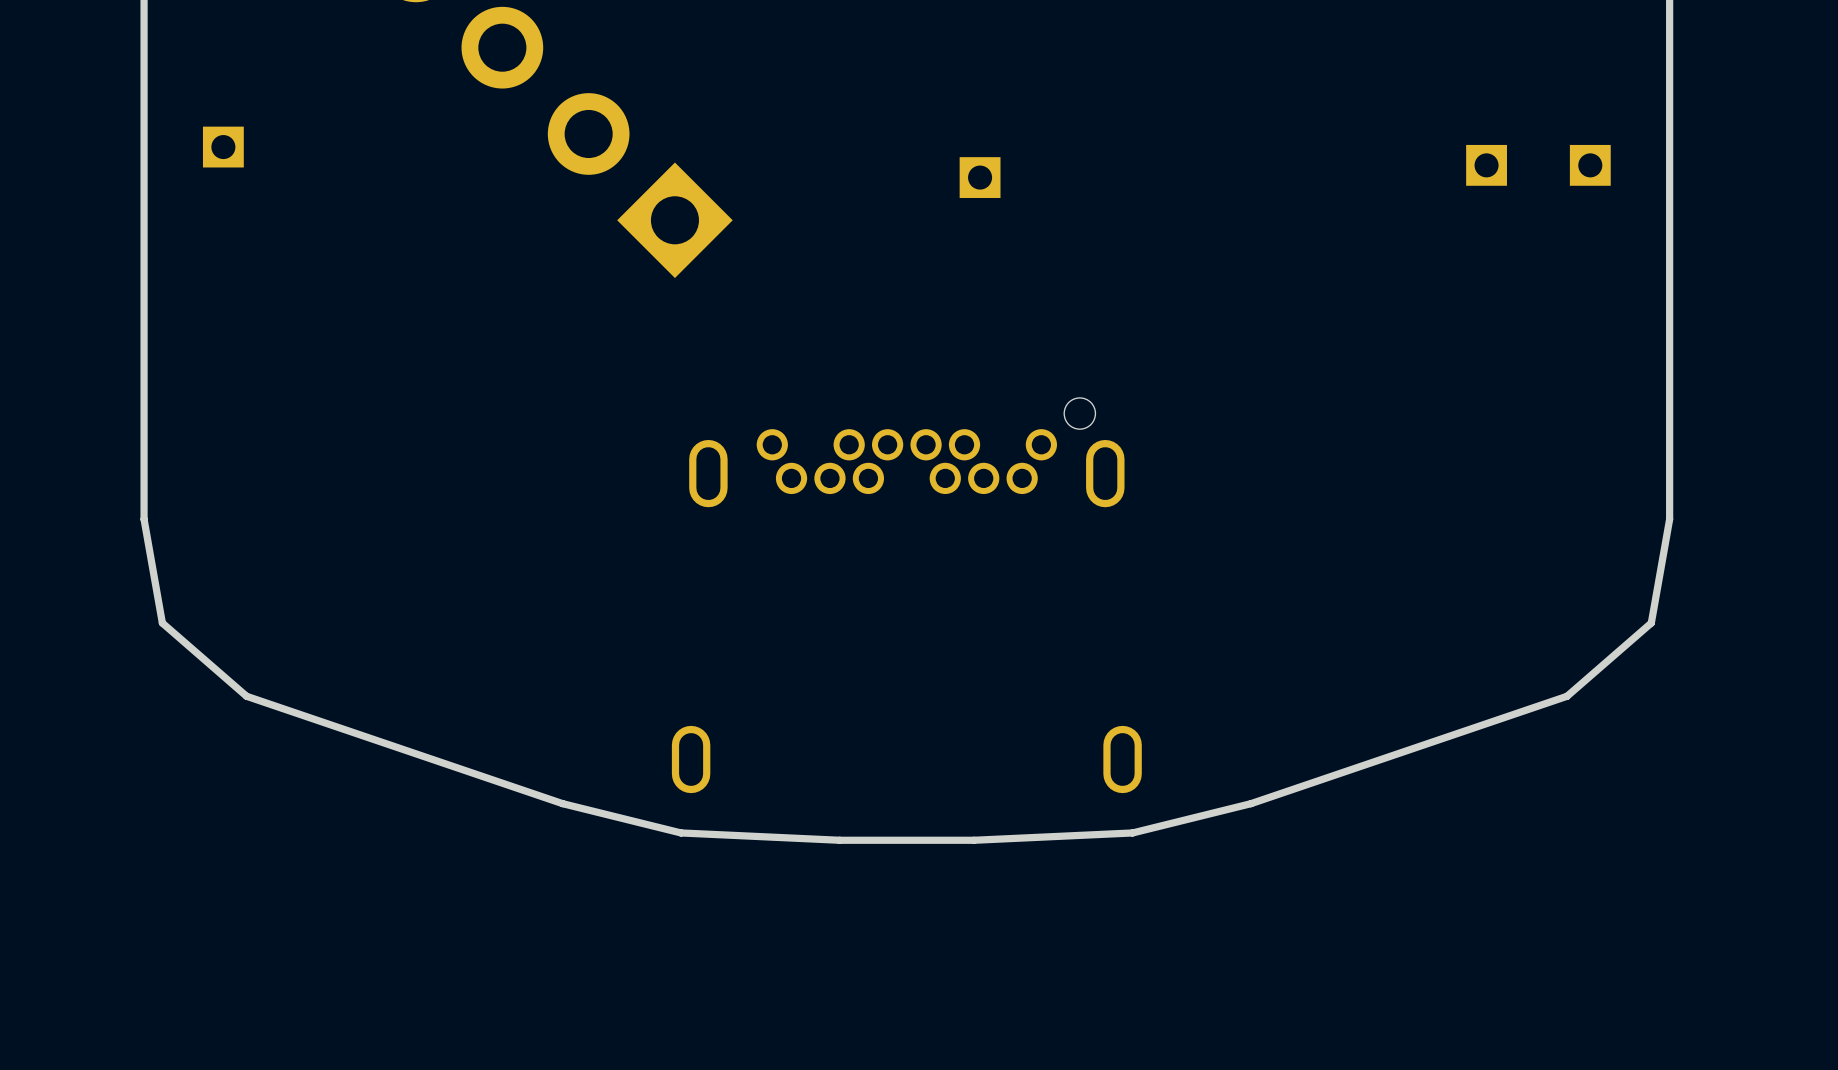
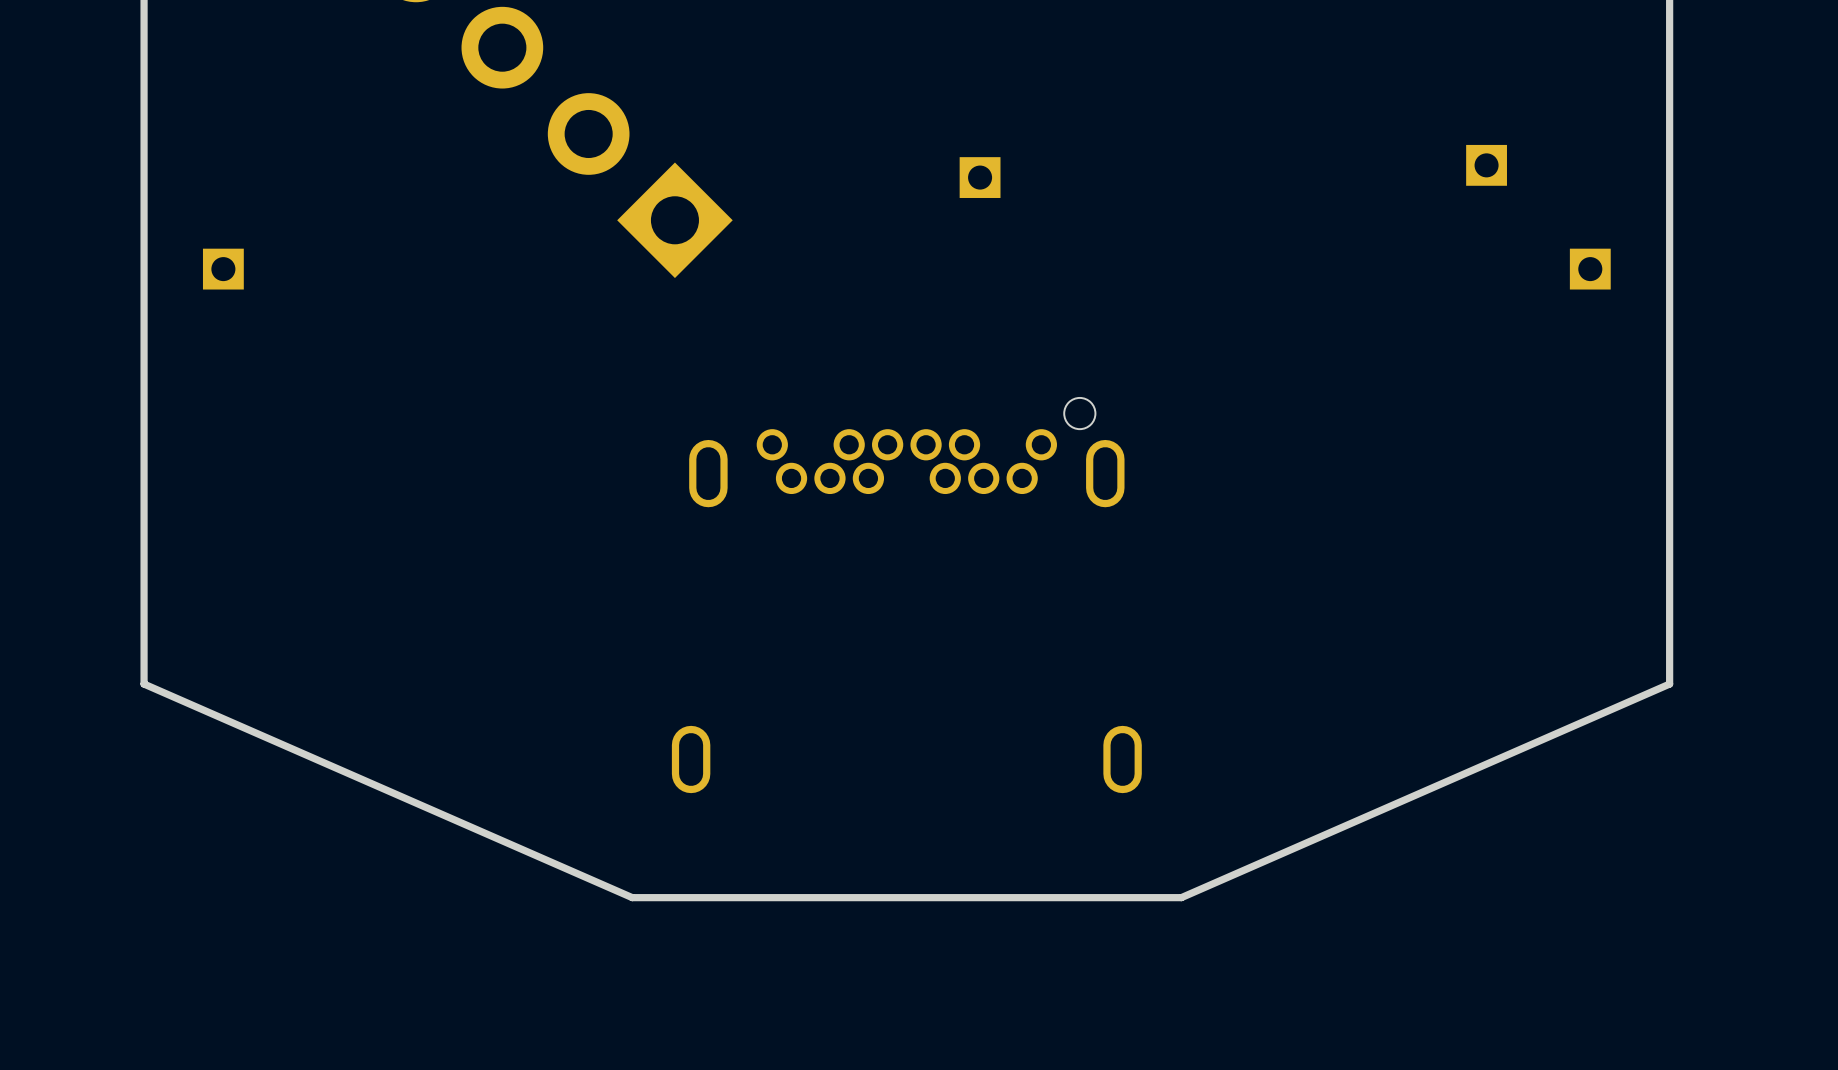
part position: (223, 147) -> (223, 269)
part position: (1590, 165) -> (1590, 269)
board edge: (1669, 519) (1651, 623) (1567, 696) (1251, 803) (1132, 832) (973, 840) (839, 840) (681, 832) (562, 803) (246, 696) (162, 623) (144, 519) -> (1669, 519) (1669, 684) (1181, 897) (632, 897) (144, 684) (144, 519)

